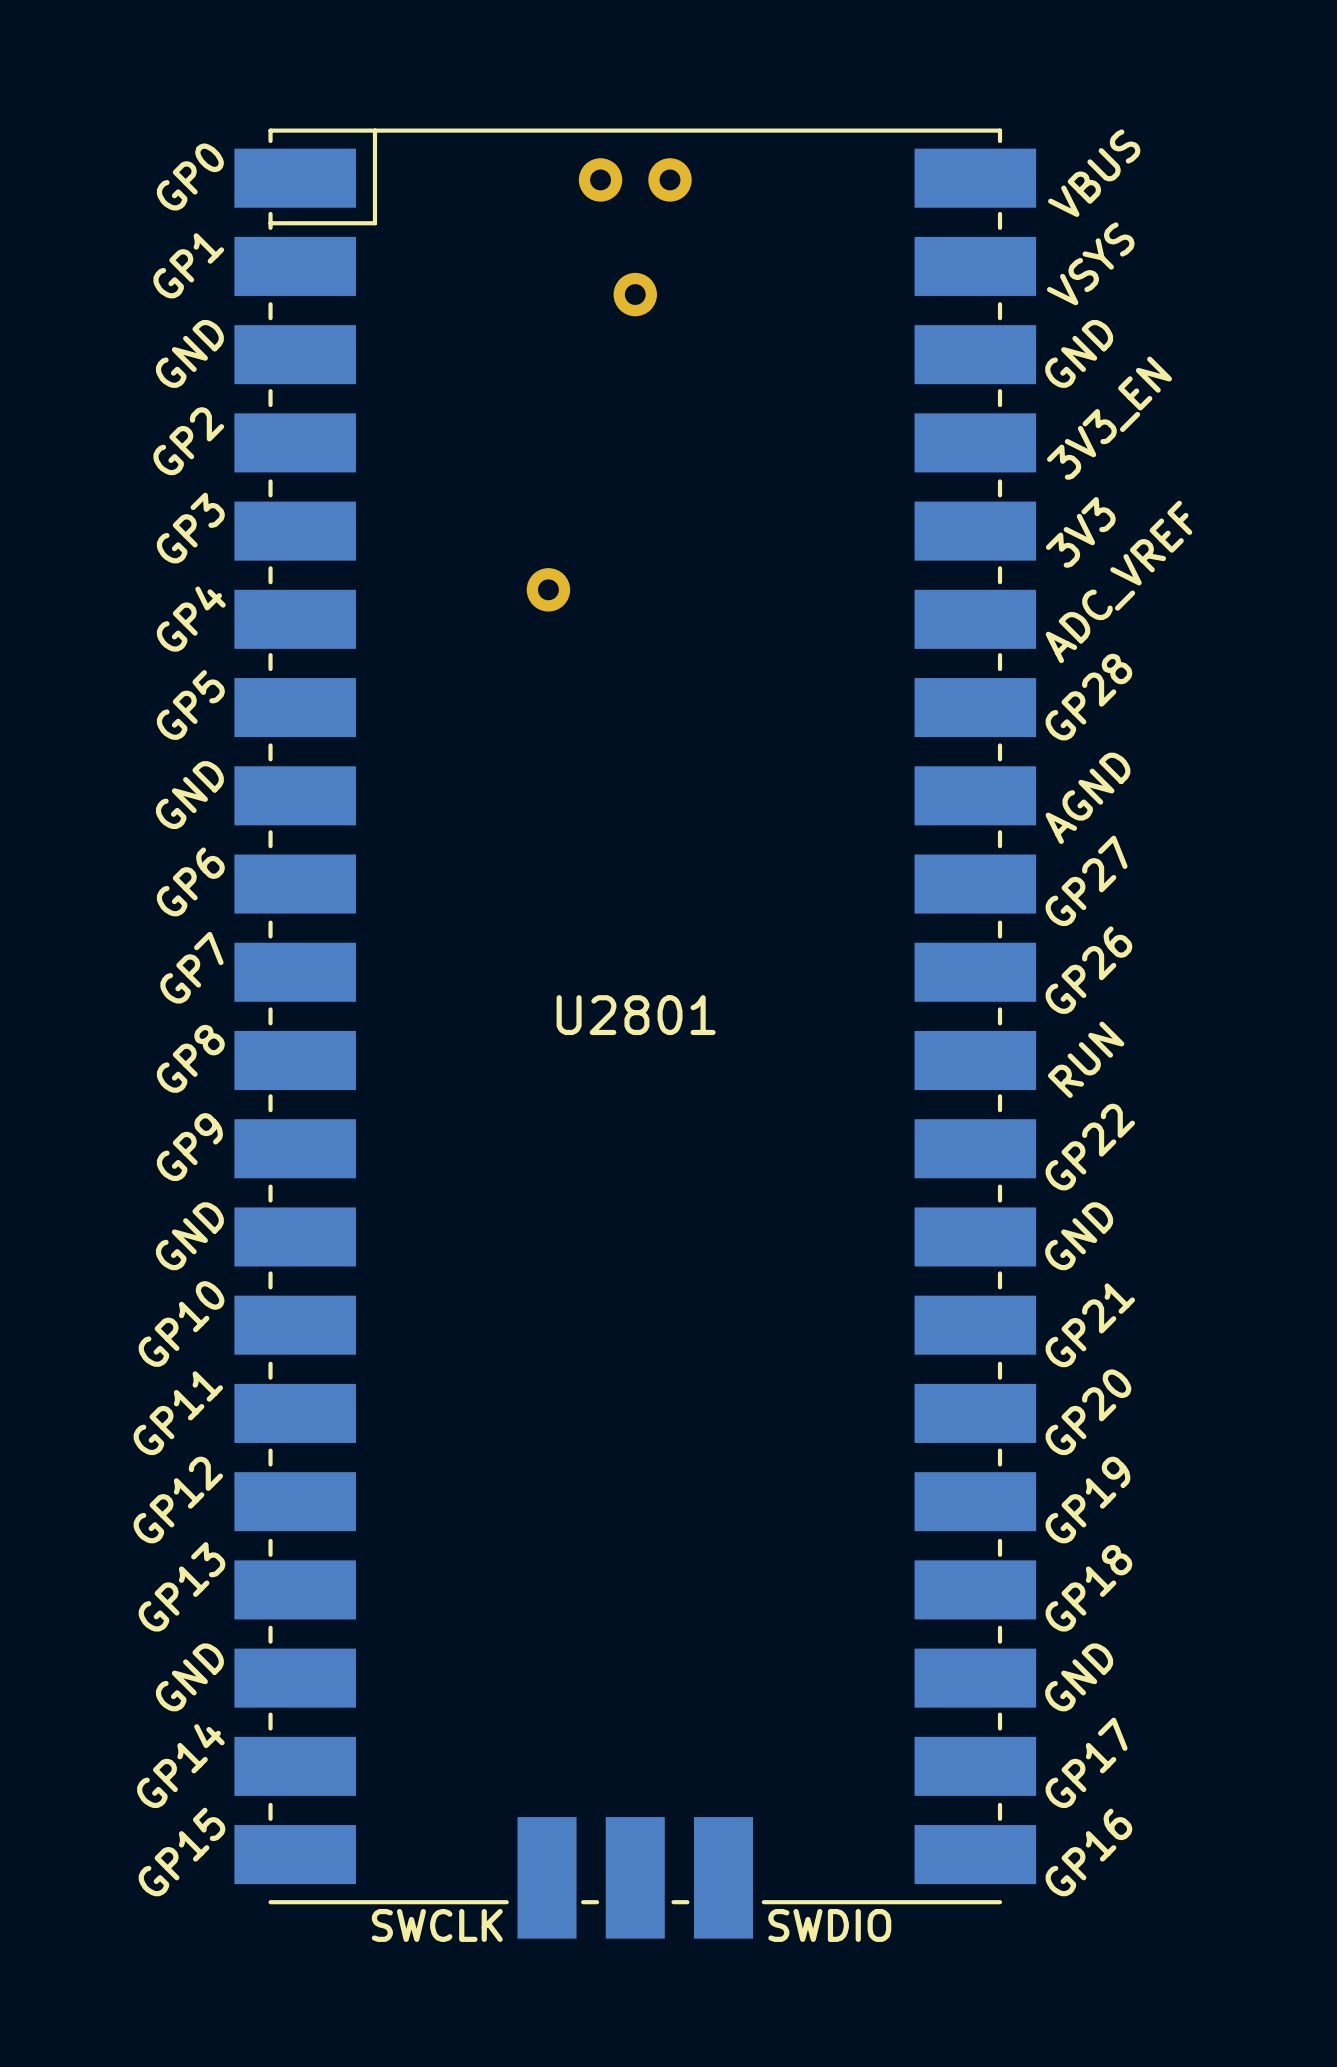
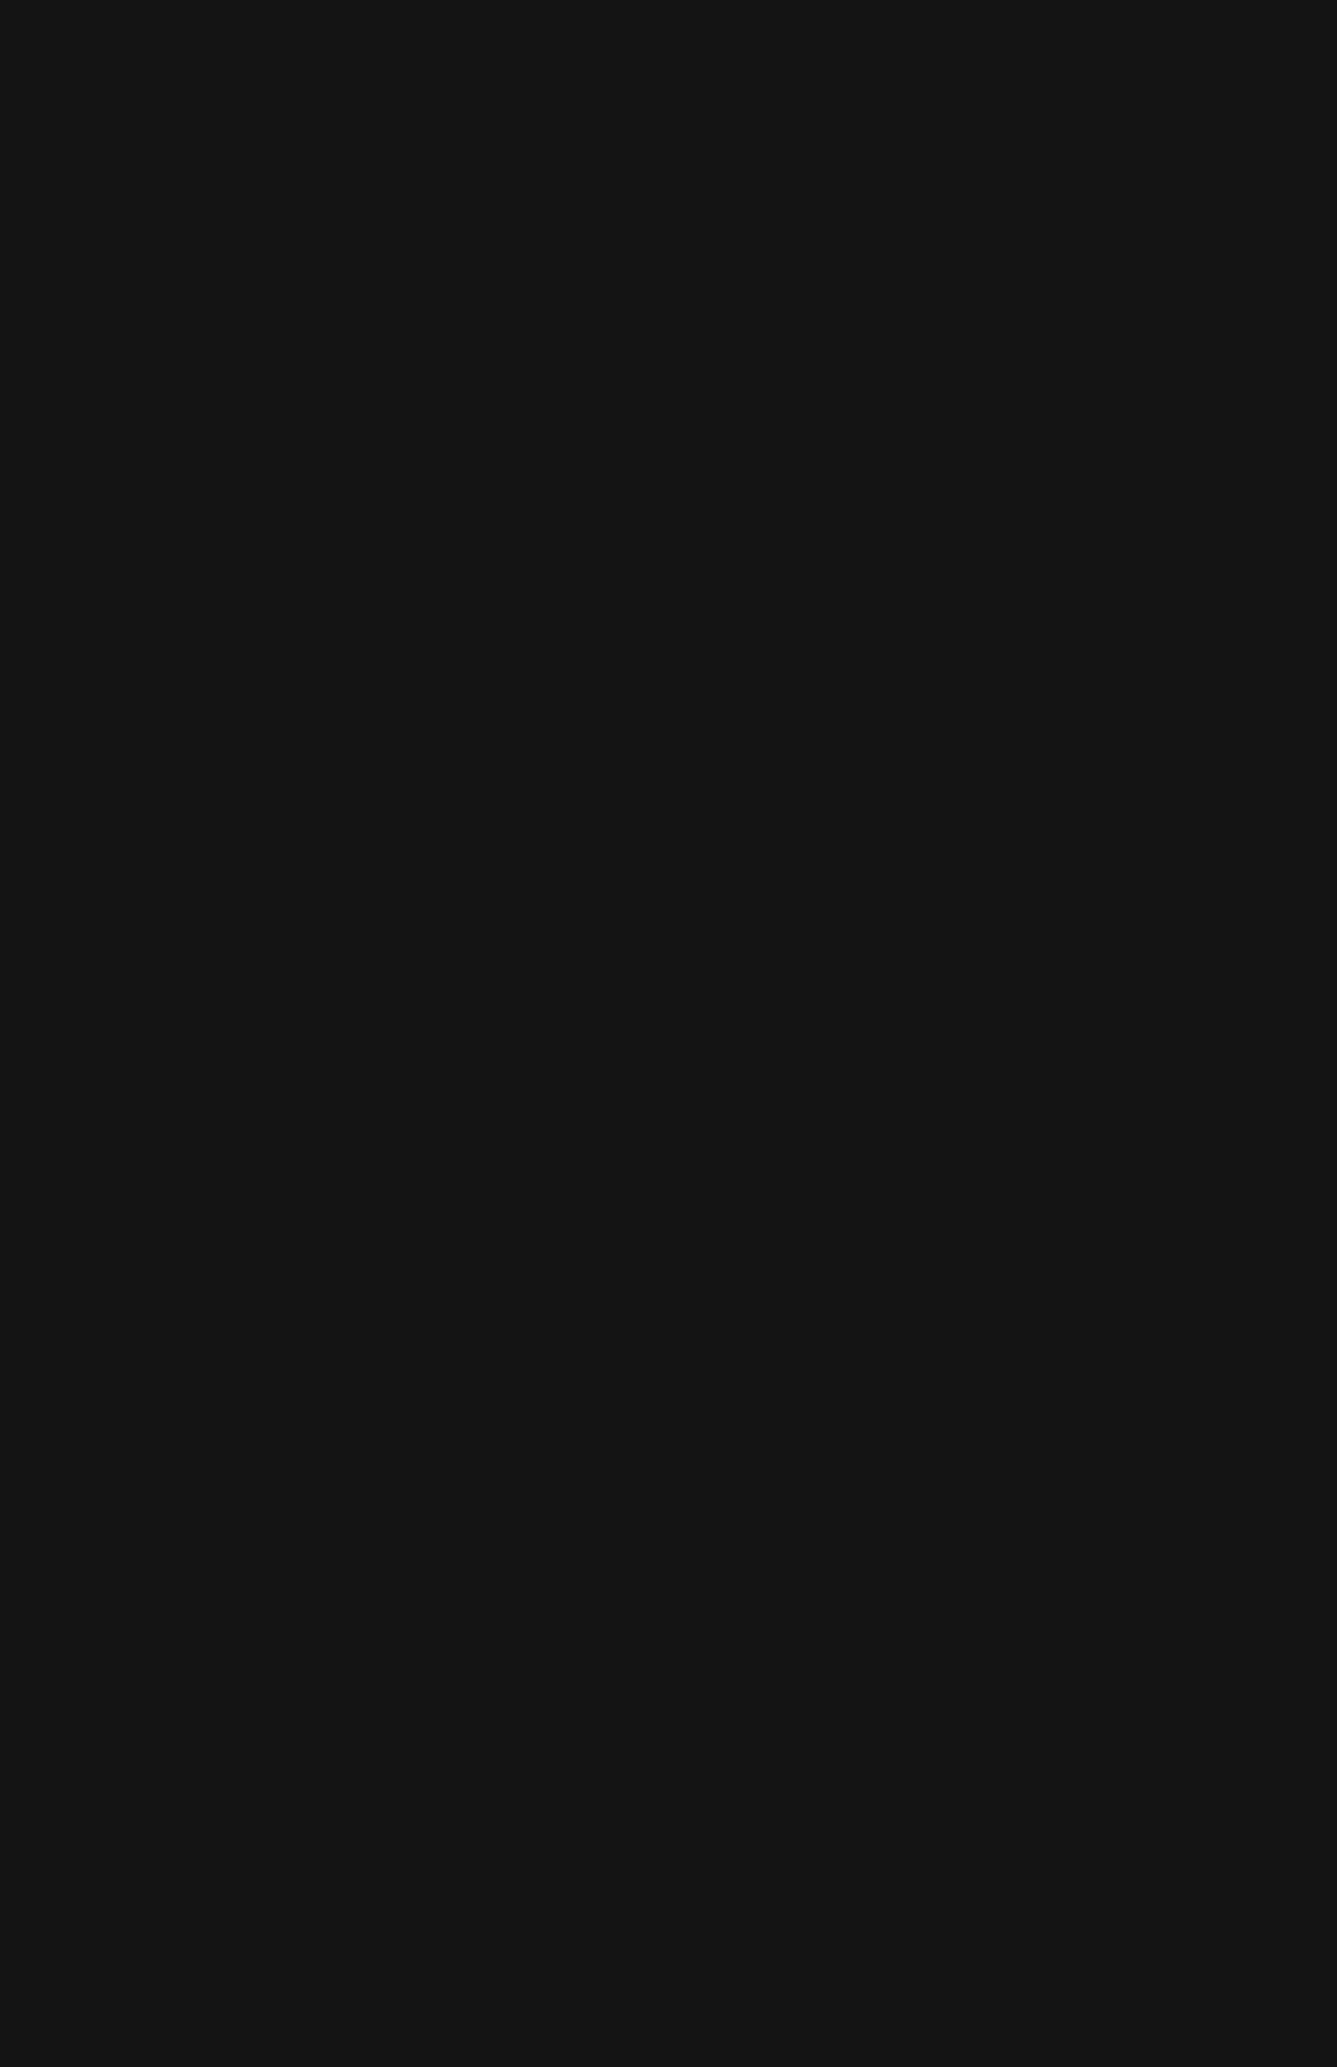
U2801: (635, 1033) -> none

